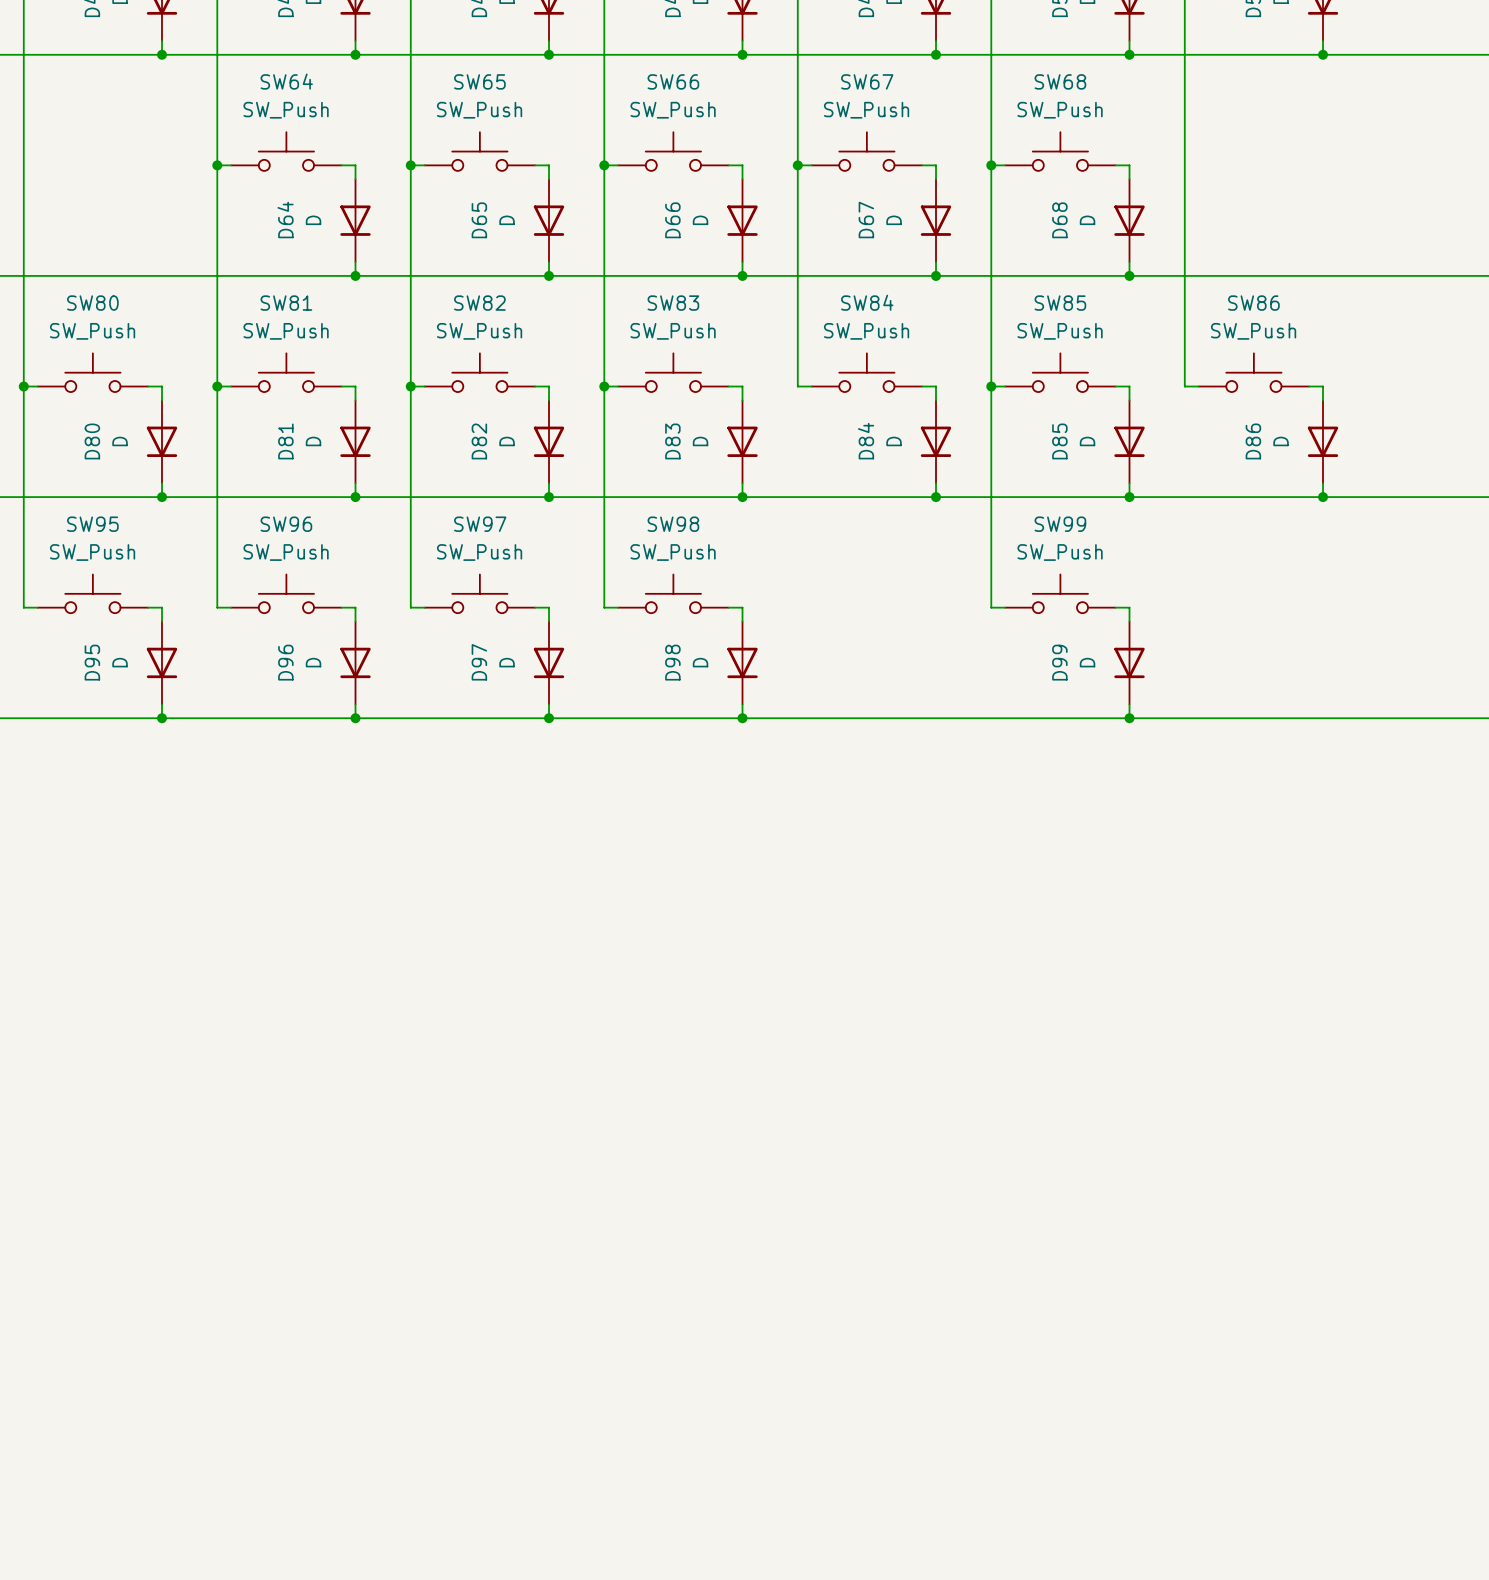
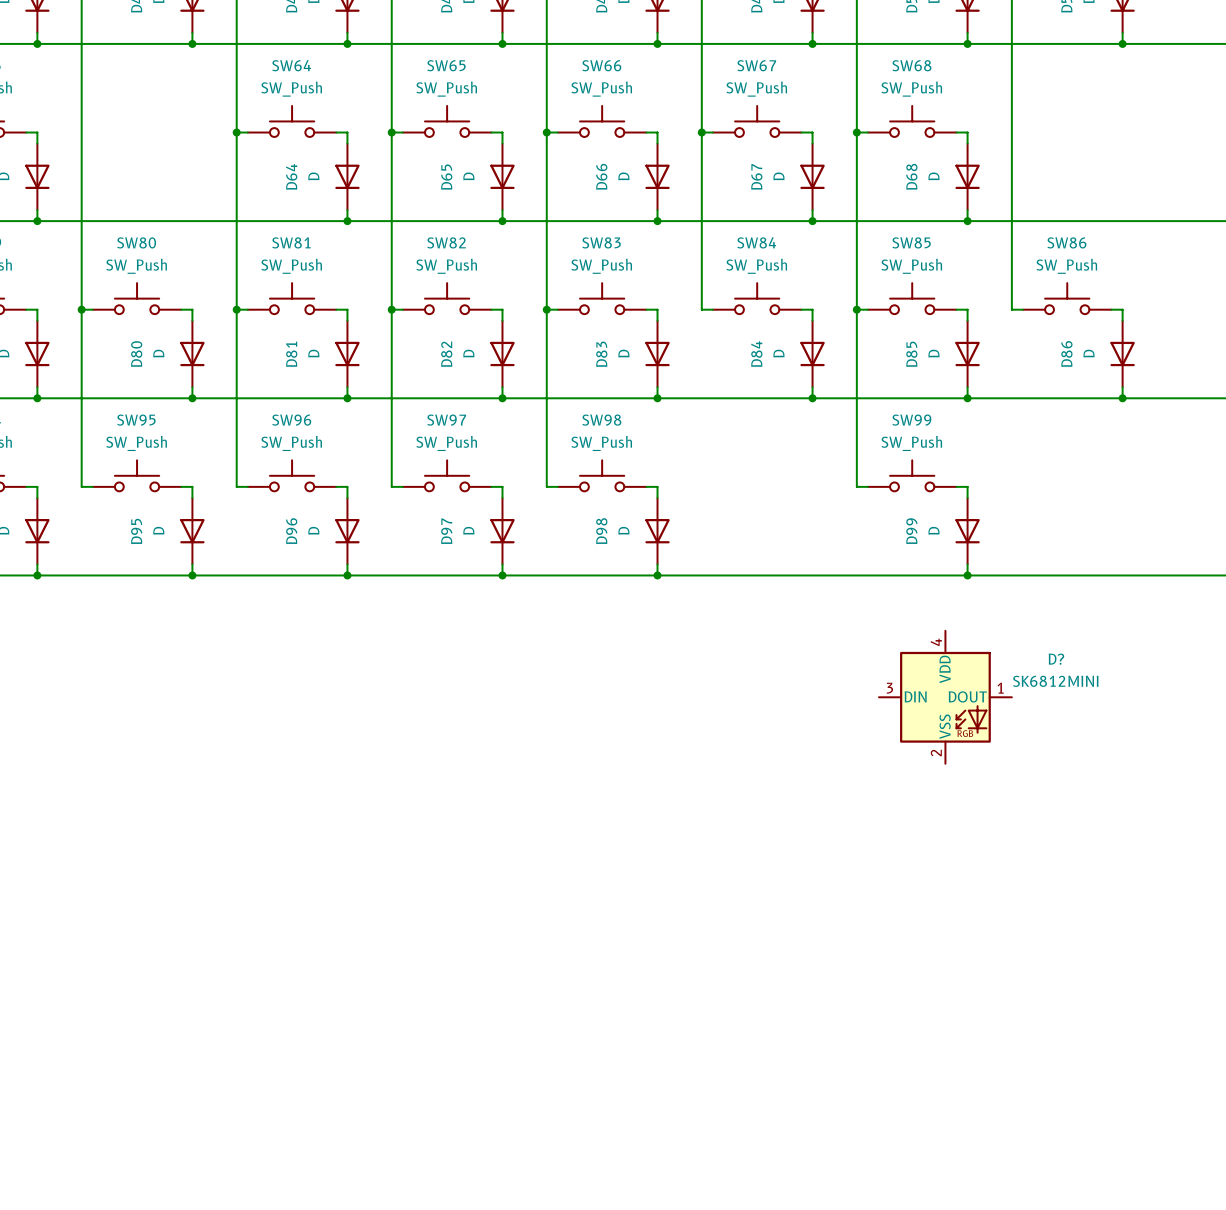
D?: none -> SK6812MINI (945, 697)

